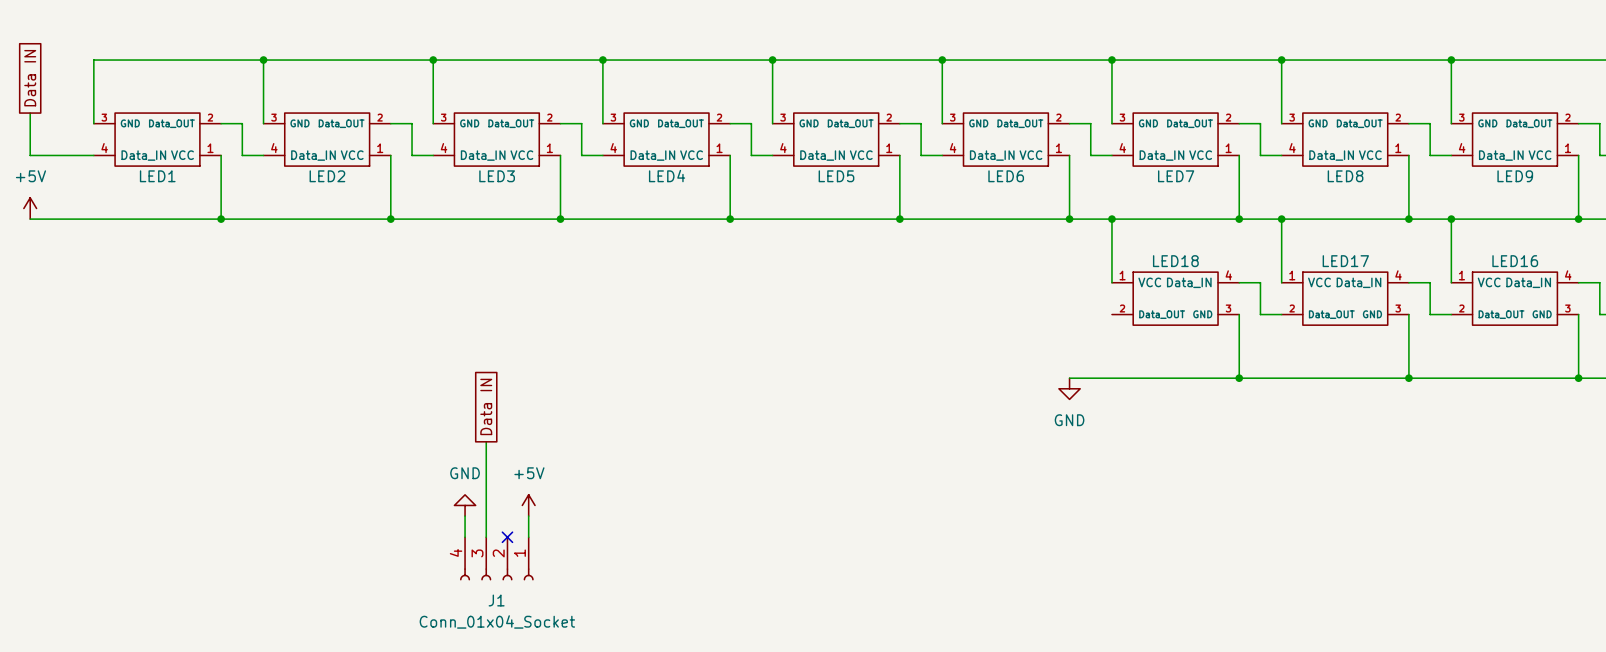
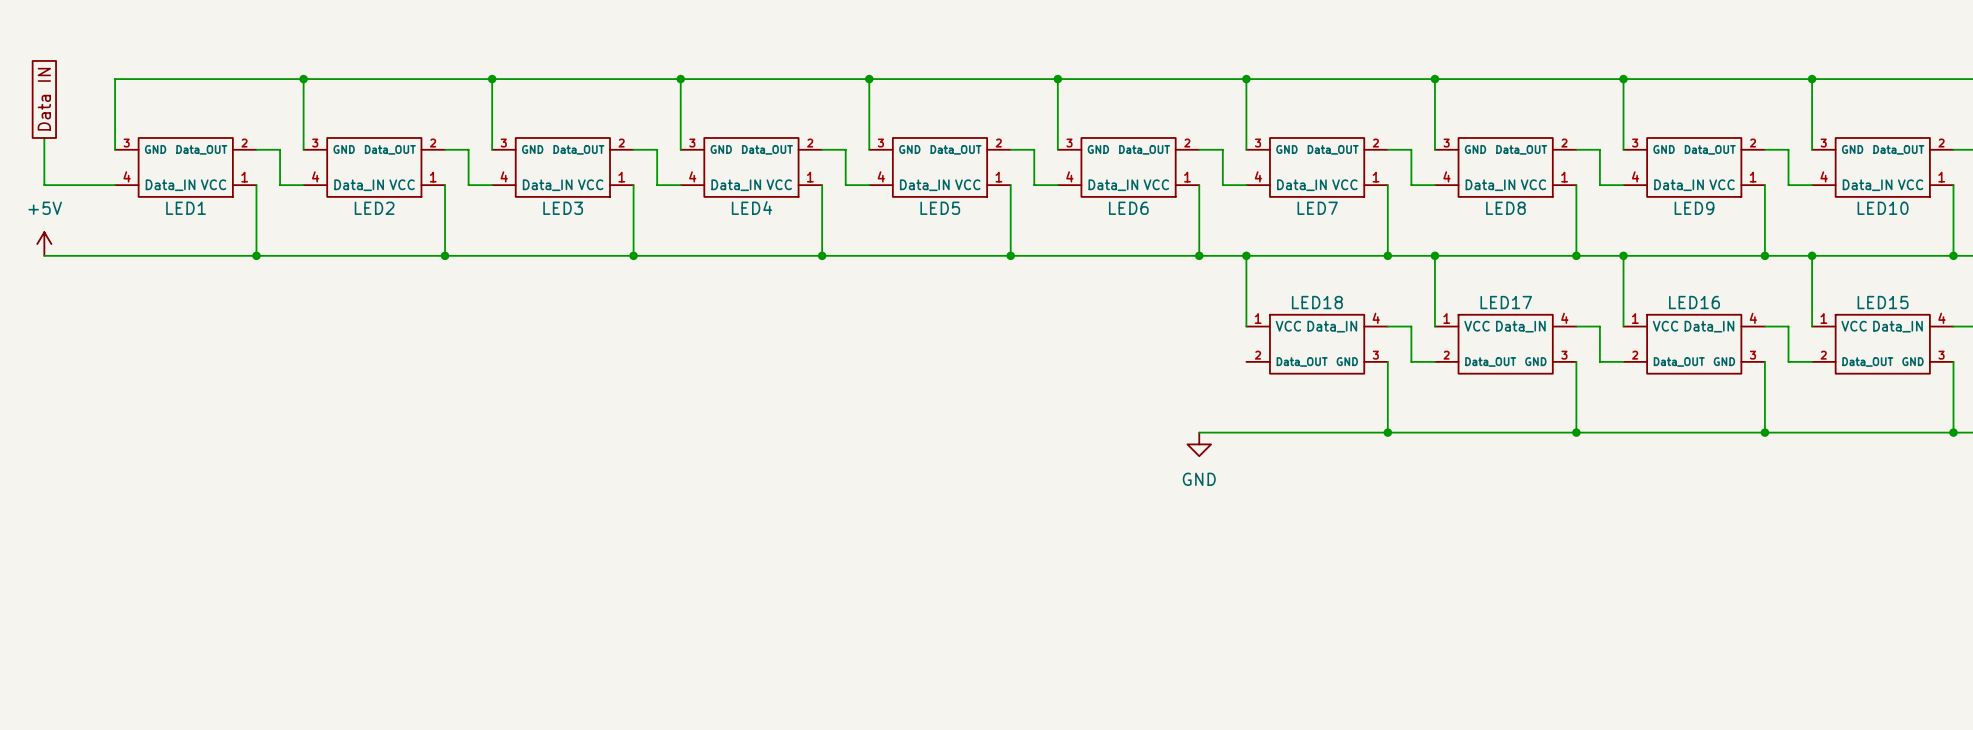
global label: Data IN (486, 406) -> none
wire: (486, 441) (486, 537) -> none
power symbol: GND (465, 505) -> none
power symbol: +5V (528, 505) -> none
wire: (465, 516) (465, 537) -> none
wire: (528, 516) (528, 537) -> none
no-connect mark: (507, 537) -> none
J1: Conn_01x04_Socket (496, 558) -> none

